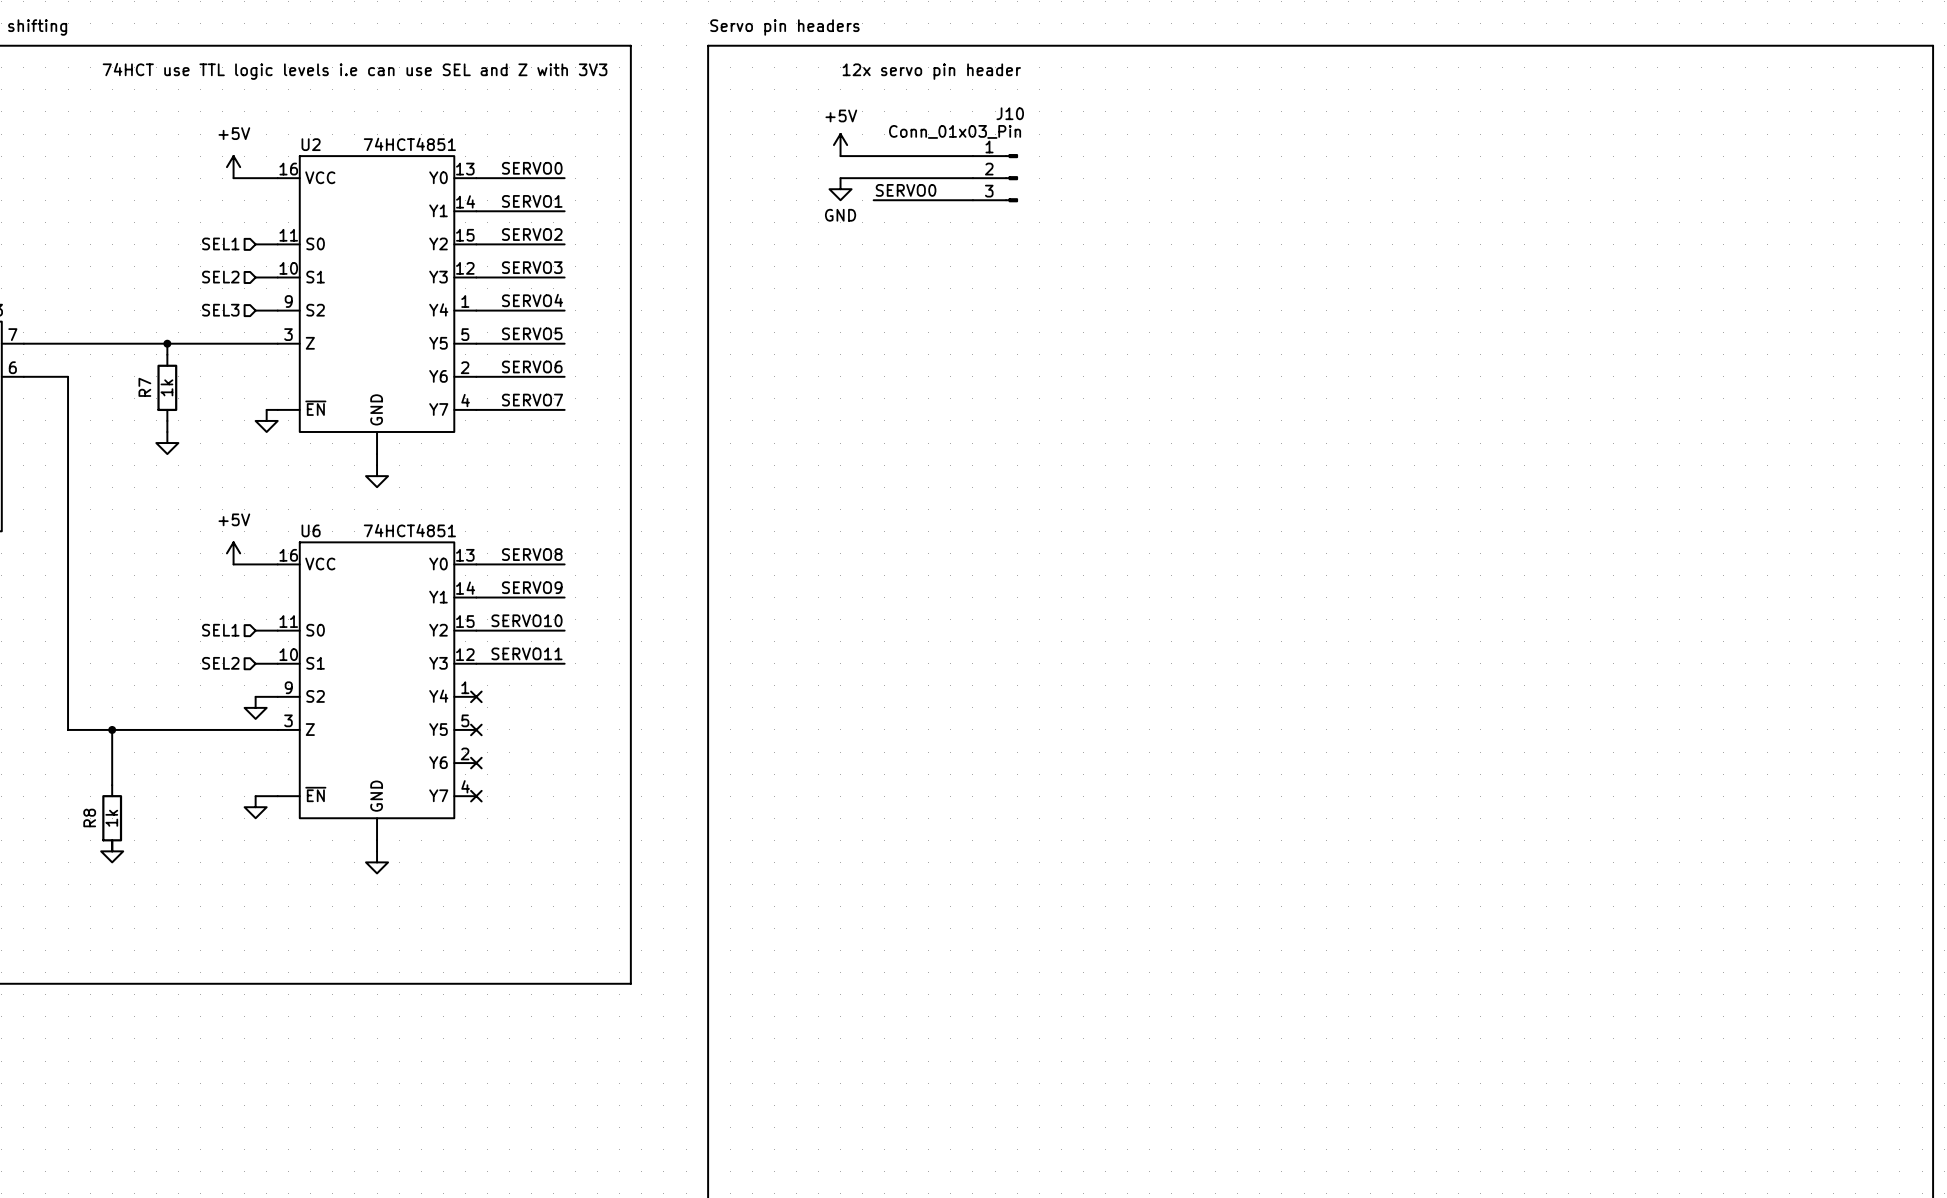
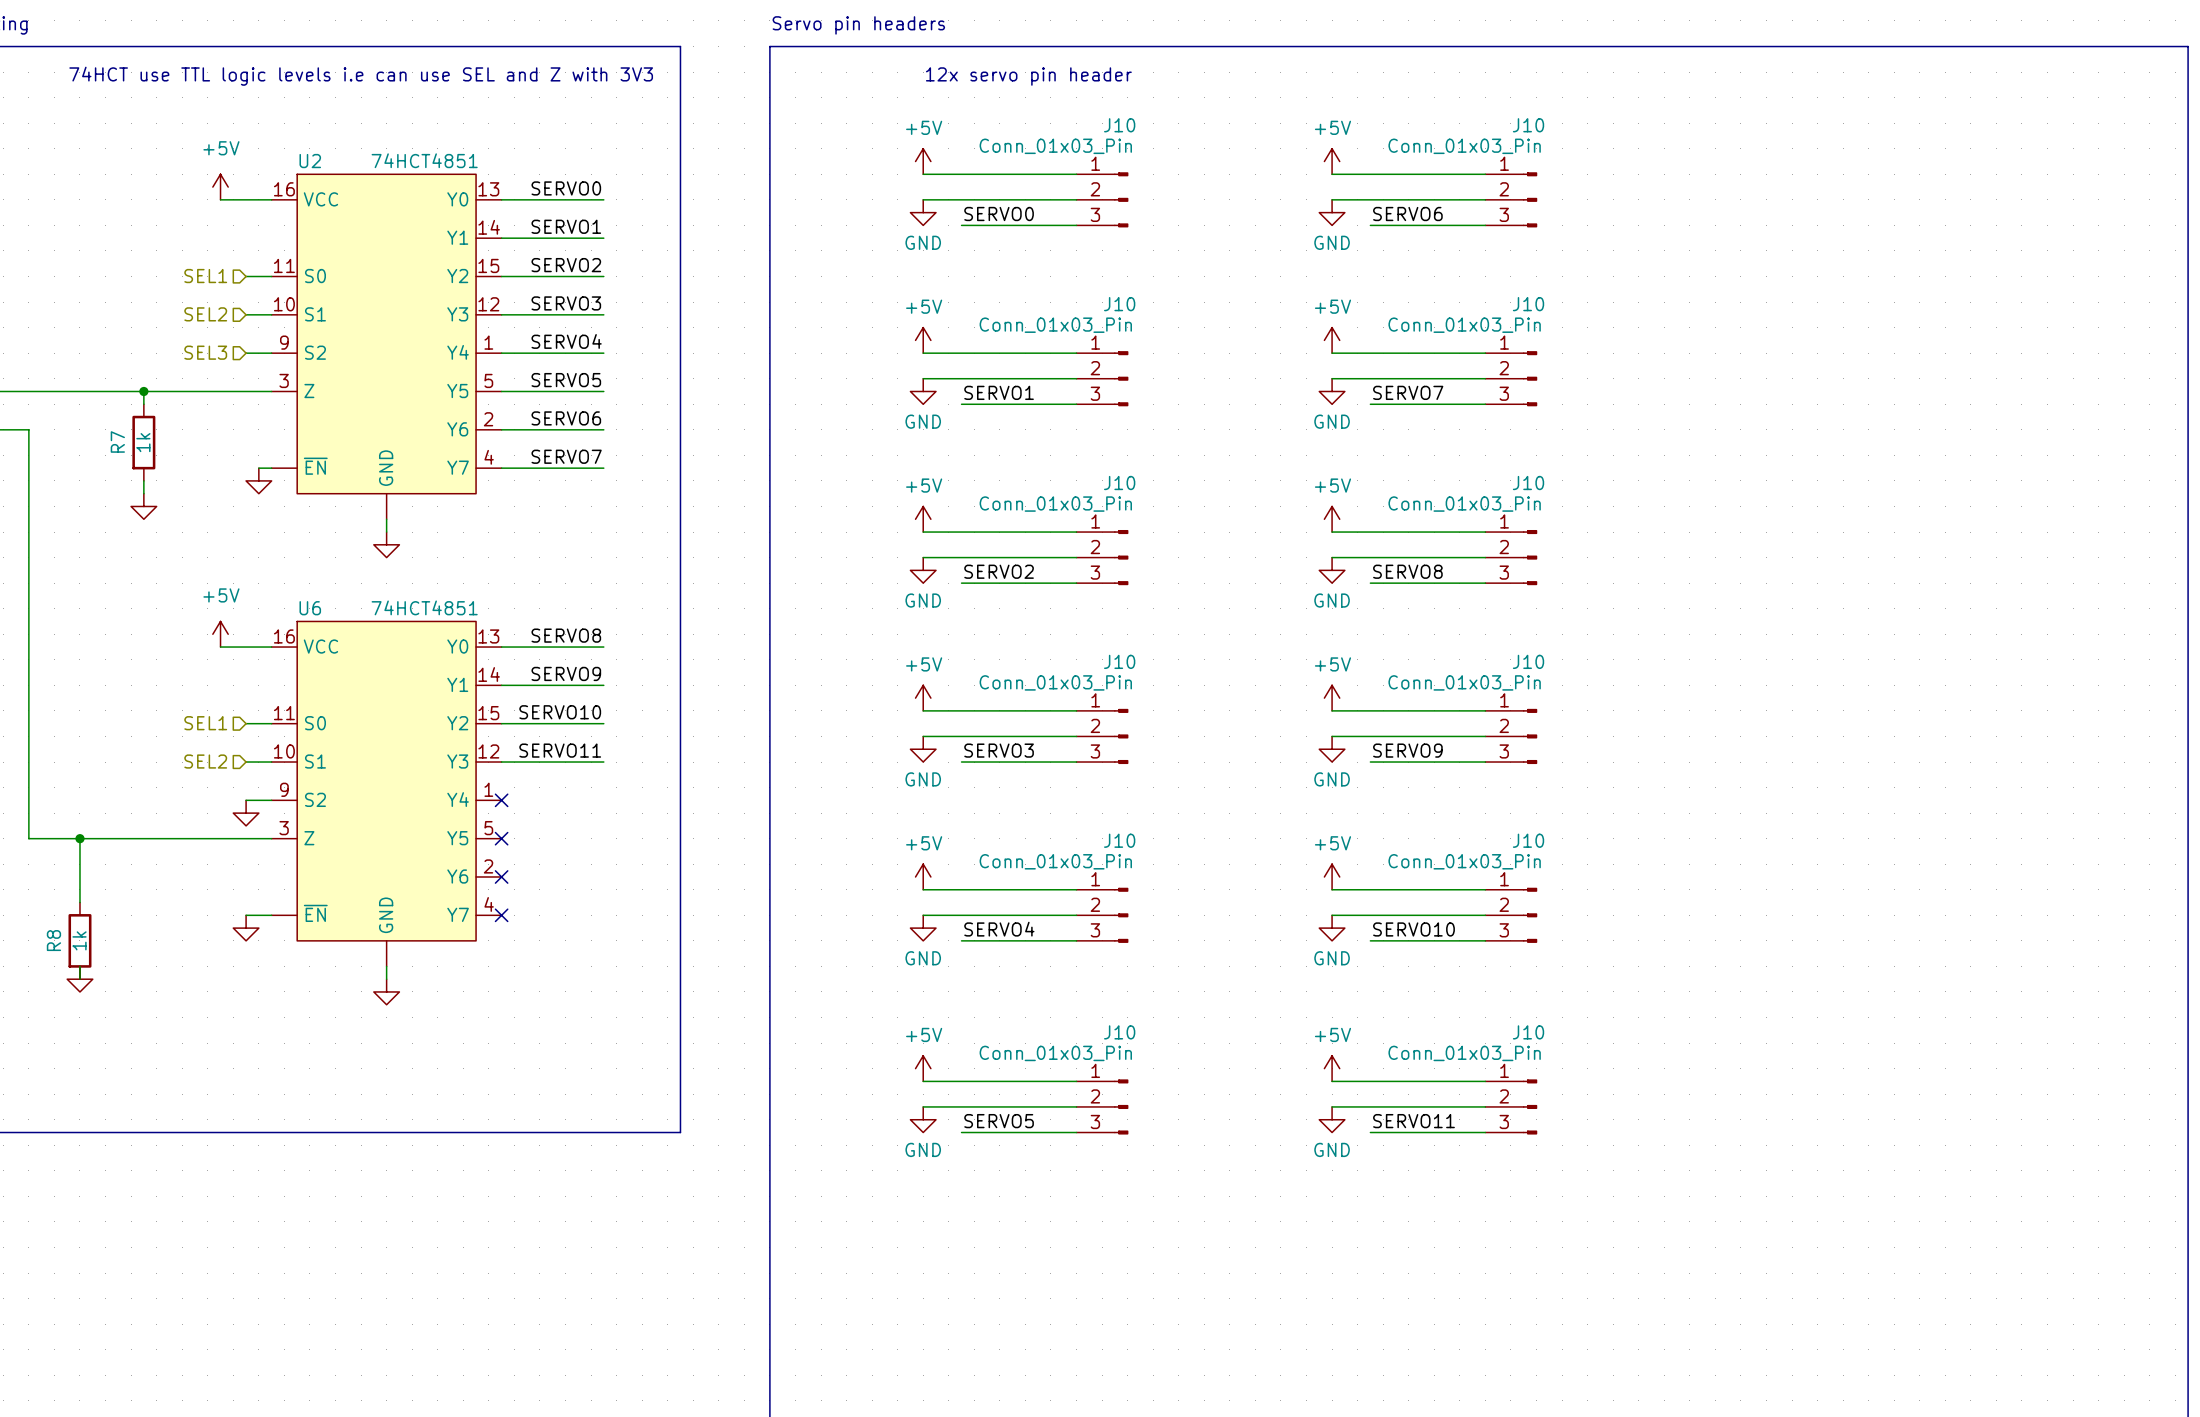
power symbol: none -> +5V (1332, 161)
wire: none -> (1332, 174) (1485, 174)
wire: none -> (1332, 199) (1485, 199)
J10: none -> Conn_01x03_Pin (1511, 199)
power symbol: none -> GND (1332, 212)
label: none -> SERVO6 (1407, 214)
wire: none -> (1370, 225) (1485, 225)
power symbol: none -> +5V (923, 340)
power symbol: none -> +5V (1332, 340)
wire: none -> (923, 353) (1076, 353)
wire: none -> (1332, 353) (1485, 353)
wire: none -> (923, 378) (1076, 378)
J10: none -> Conn_01x03_Pin (1102, 378)
wire: none -> (1332, 378) (1485, 378)
J10: none -> Conn_01x03_Pin (1511, 378)
power symbol: none -> GND (923, 391)
power symbol: none -> GND (1332, 391)
label: none -> SERVO1 (999, 392)
label: none -> SERVO7 (1408, 392)
wire: none -> (961, 404) (1076, 404)
wire: none -> (1370, 404) (1485, 404)
power symbol: none -> +5V (923, 519)
power symbol: none -> +5V (1332, 519)
wire: none -> (923, 532) (1076, 532)
wire: none -> (1332, 532) (1485, 532)
wire: none -> (923, 557) (1076, 557)
J10: none -> Conn_01x03_Pin (1102, 557)
wire: none -> (1332, 557) (1485, 557)
J10: none -> Conn_01x03_Pin (1511, 557)
power symbol: none -> GND (923, 570)
power symbol: none -> GND (1332, 570)
label: none -> SERVO2 (999, 571)
label: none -> SERVO8 (1407, 571)
wire: none -> (961, 583) (1076, 583)
wire: none -> (1370, 583) (1485, 583)
power symbol: none -> +5V (923, 698)
power symbol: none -> +5V (1332, 698)
wire: none -> (923, 710) (1076, 710)
wire: none -> (1332, 710) (1485, 710)
wire: none -> (923, 736) (1076, 736)
J10: none -> Conn_01x03_Pin (1102, 736)
wire: none -> (1332, 736) (1485, 736)
J10: none -> Conn_01x03_Pin (1511, 736)
power symbol: none -> GND (923, 749)
power symbol: none -> GND (1332, 749)
label: none -> SERVO3 (999, 750)
label: none -> SERVO9 (1407, 750)
wire: none -> (961, 762) (1076, 762)
wire: none -> (1370, 762) (1485, 762)
power symbol: none -> +5V (923, 876)
power symbol: none -> +5V (1332, 876)
wire: none -> (923, 889) (1076, 889)
wire: none -> (1332, 889) (1485, 889)
wire: none -> (923, 915) (1076, 915)
J10: none -> Conn_01x03_Pin (1102, 915)
wire: none -> (1332, 915) (1485, 915)
J10: none -> Conn_01x03_Pin (1511, 915)
power symbol: none -> GND (923, 928)
power symbol: none -> GND (1332, 928)
label: none -> SERVO4 (999, 929)
label: none -> SERVO10 (1413, 929)
wire: none -> (961, 940) (1076, 940)
wire: none -> (1370, 940) (1485, 940)
power symbol: none -> +5V (923, 1068)
power symbol: none -> +5V (1332, 1068)
wire: none -> (923, 1081) (1076, 1081)
wire: none -> (1332, 1081) (1485, 1081)
wire: none -> (923, 1106) (1076, 1106)
J10: none -> Conn_01x03_Pin (1102, 1106)
wire: none -> (1332, 1106) (1485, 1106)
J10: none -> Conn_01x03_Pin (1511, 1106)
power symbol: none -> GND (923, 1119)
power symbol: none -> GND (1332, 1119)
label: none -> SERVO5 (999, 1121)
label: none -> SERVO11 (1413, 1121)
wire: none -> (961, 1132) (1076, 1132)
wire: none -> (1370, 1132) (1485, 1132)

